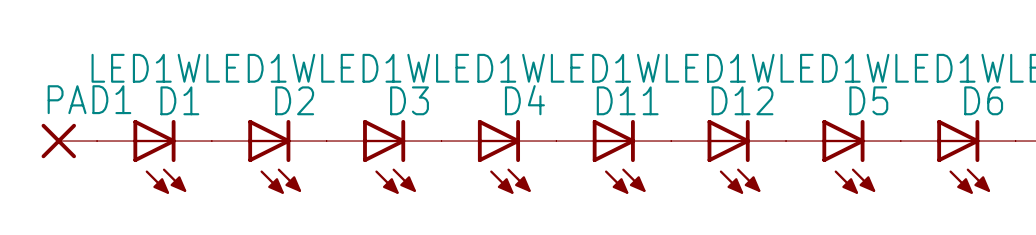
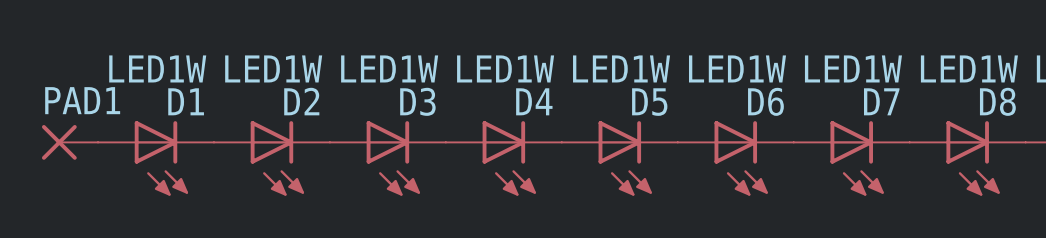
D11 name: D11 (627, 100) -> D5 (649, 102)
D12 name: D12 (742, 100) -> D6 (765, 101)
D5 name: D5 (868, 100) -> D7 (881, 101)
D6 name: D6 (983, 100) -> D8 (997, 101)

